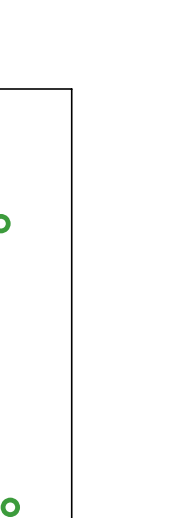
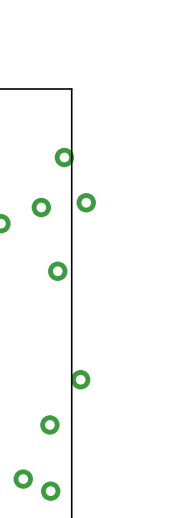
via: none -> (64, 157)
via: none -> (86, 202)
via: none -> (41, 207)
via: none -> (57, 271)
via: none -> (80, 379)
via: none -> (49, 424)
via: none -> (23, 479)
via: none -> (50, 491)
via: (10, 507) -> none

